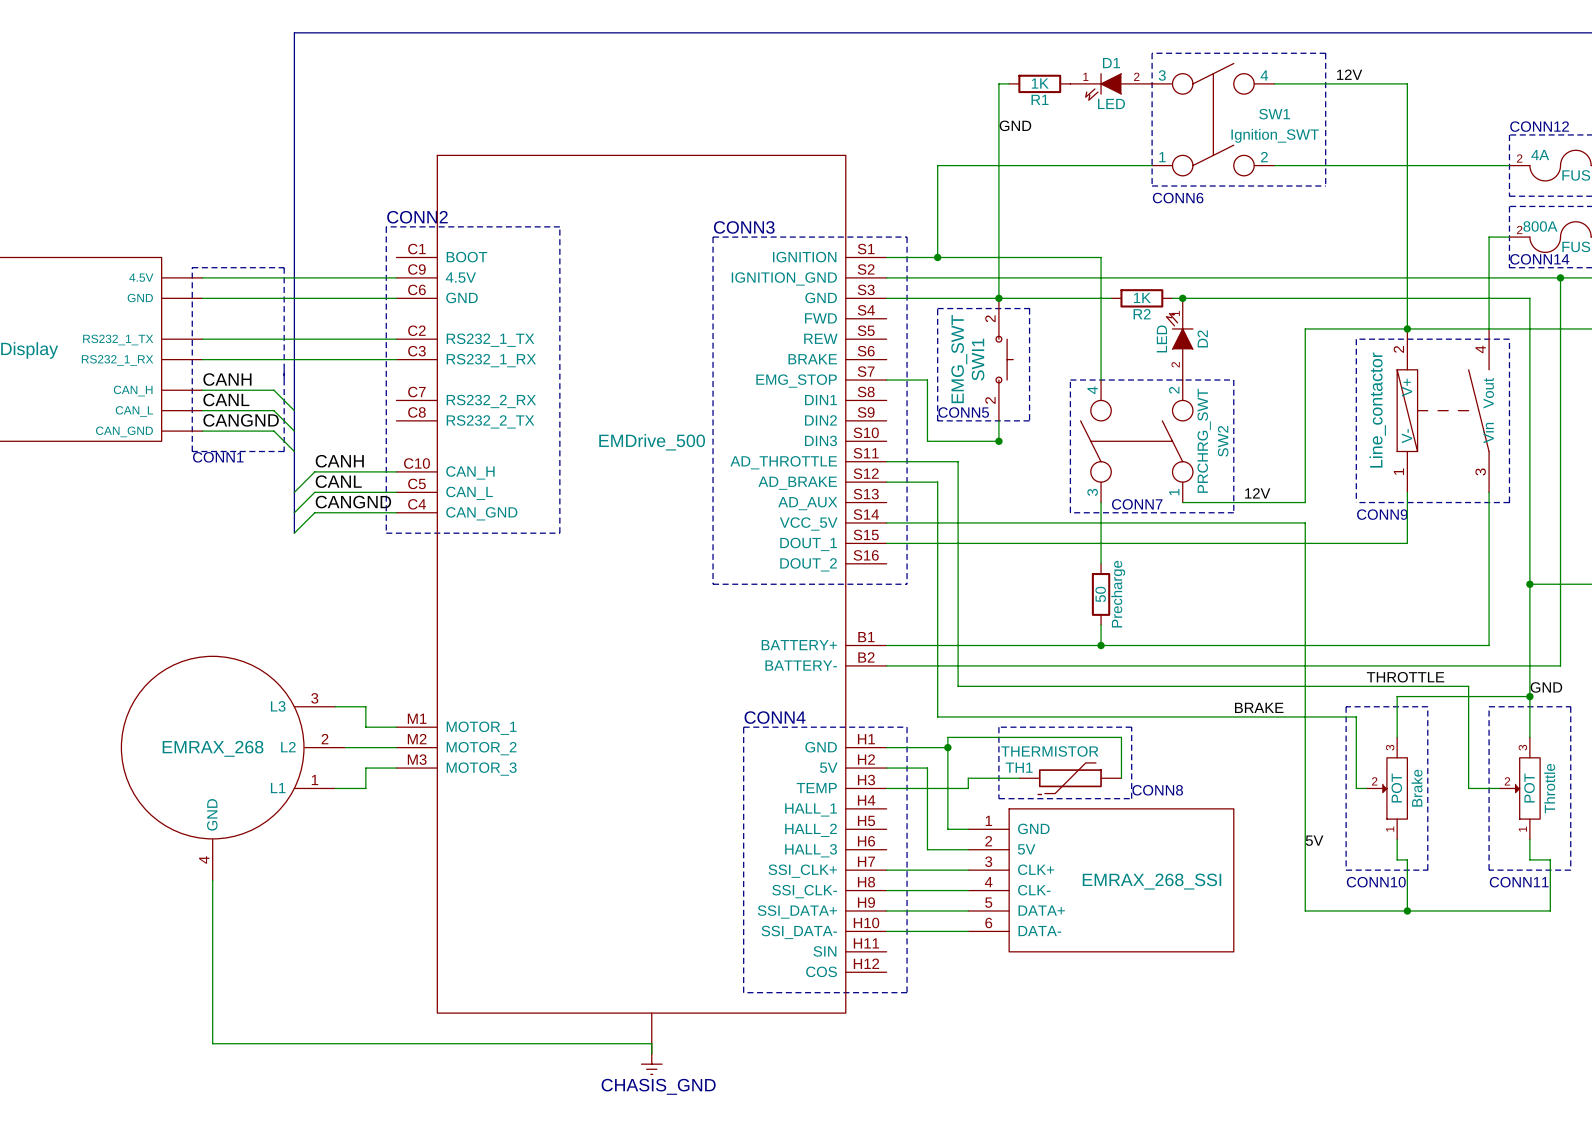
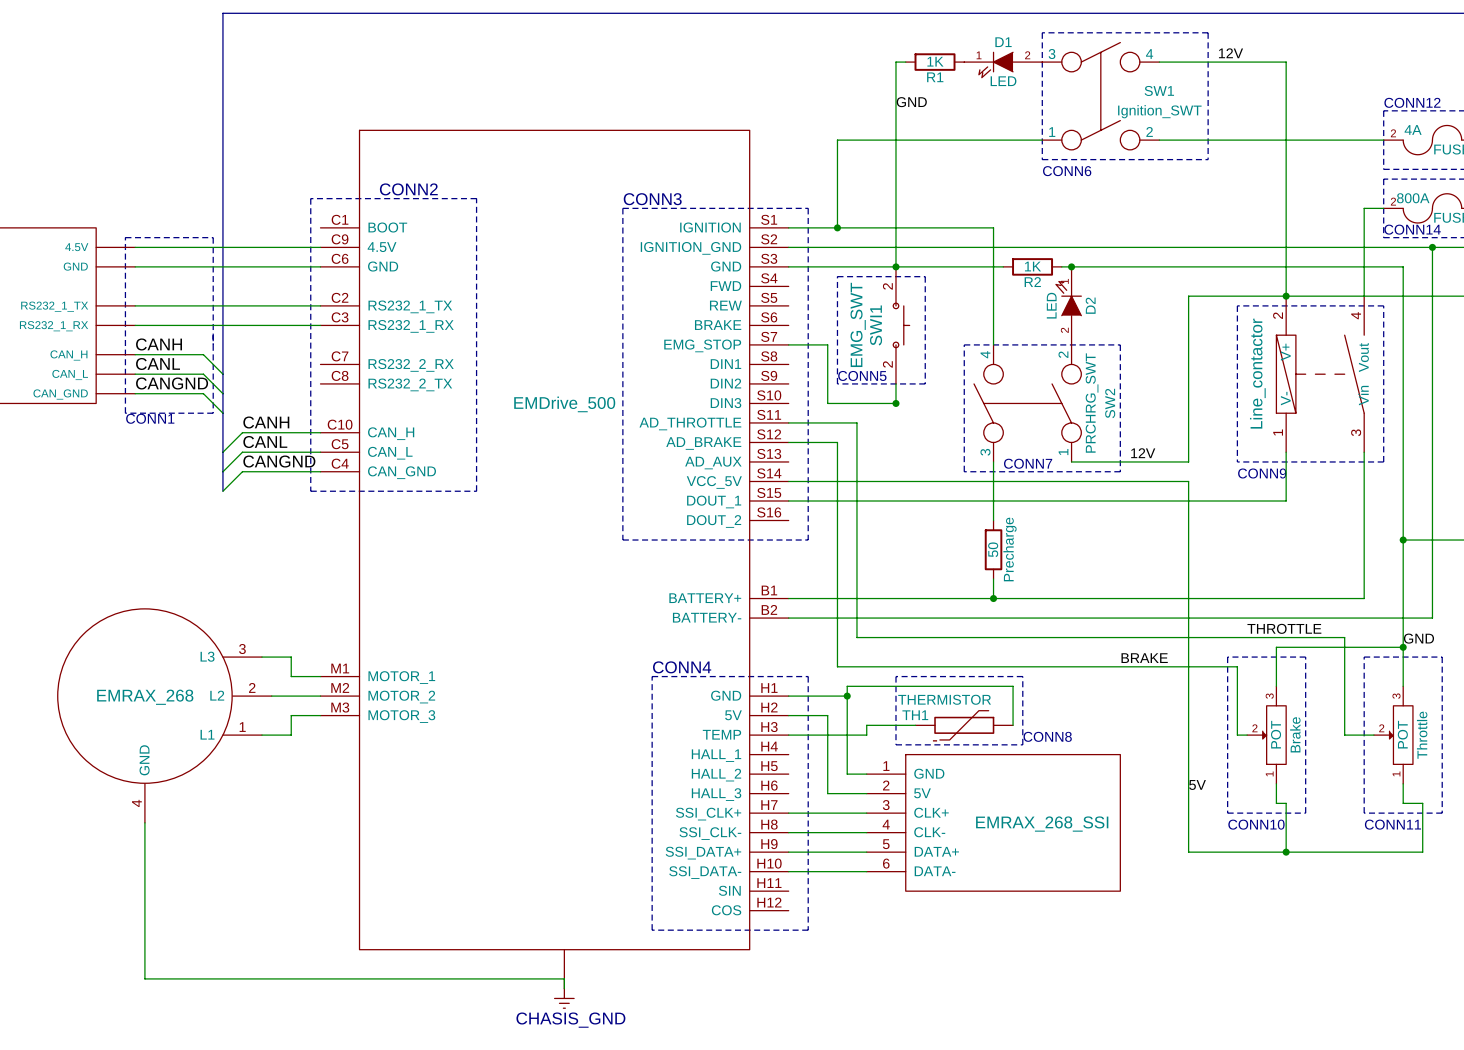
text position: CONN2 (417, 217) -> CONN2 (408, 189)

